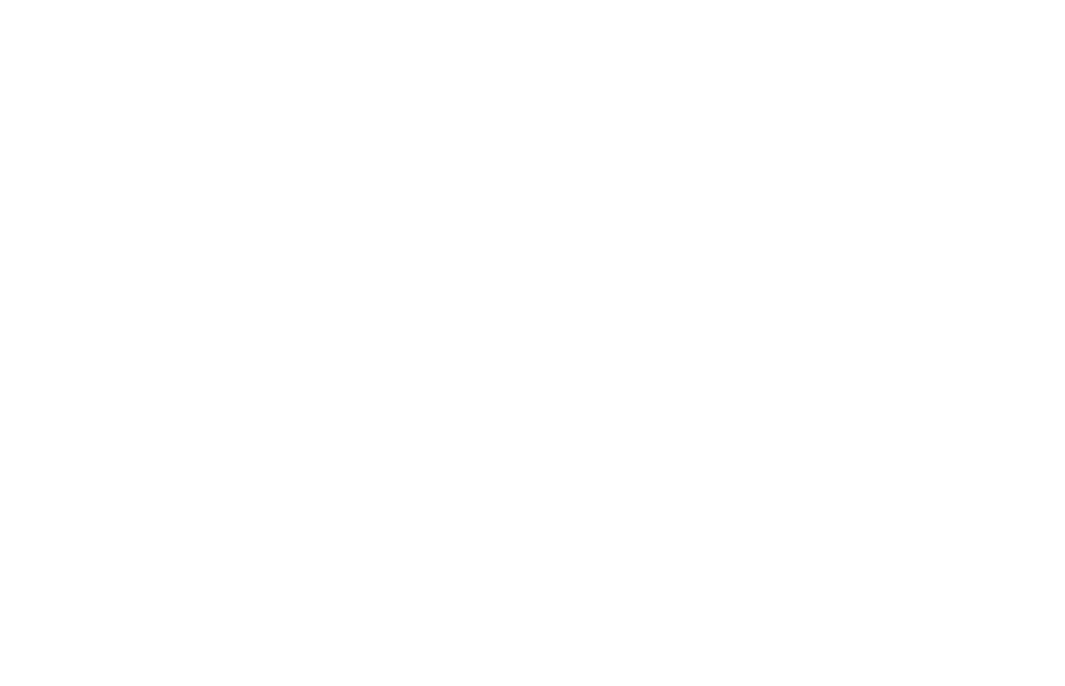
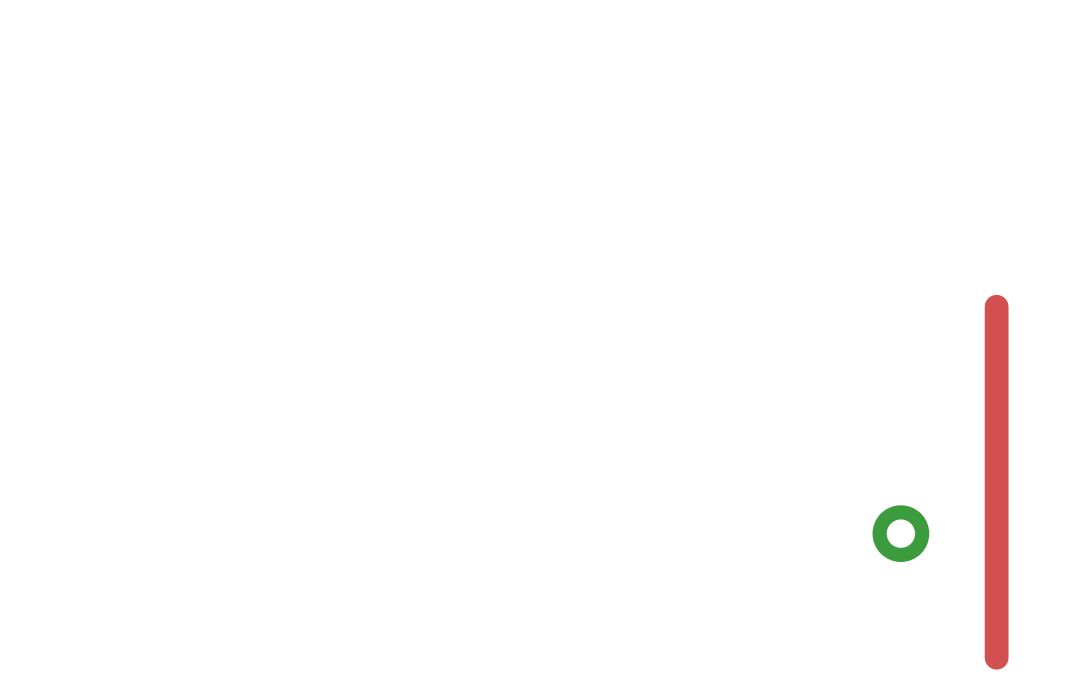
top track: none -> (996, 306) (996, 657)
via: none -> (900, 533)

